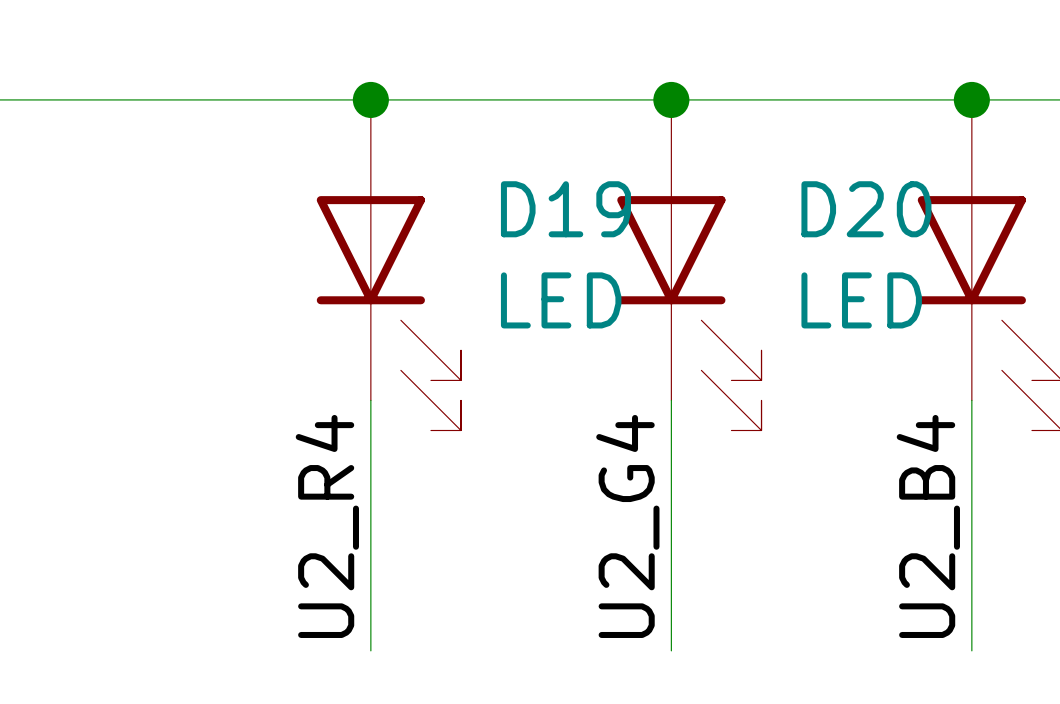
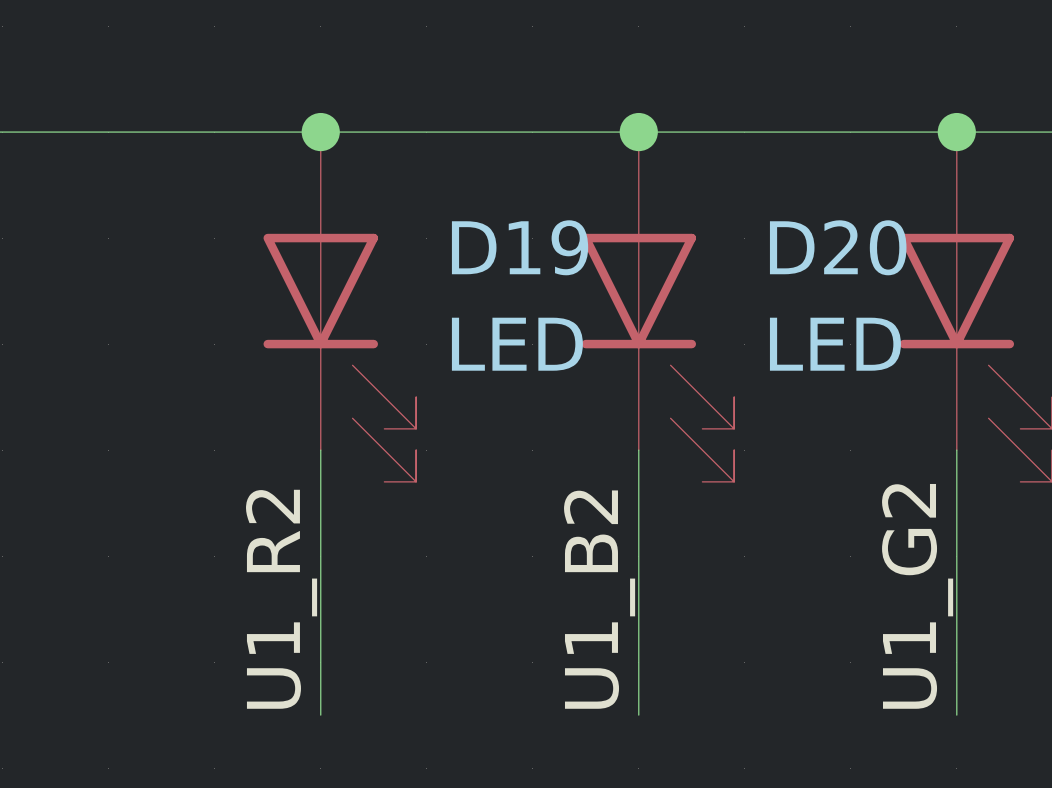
label: U2_R4 (327, 526) -> U1_R2 (281, 599)
label: U2_G4 (627, 526) -> U1_B2 (599, 599)
label: U2_B4 (928, 526) -> U1_G2 (917, 596)

